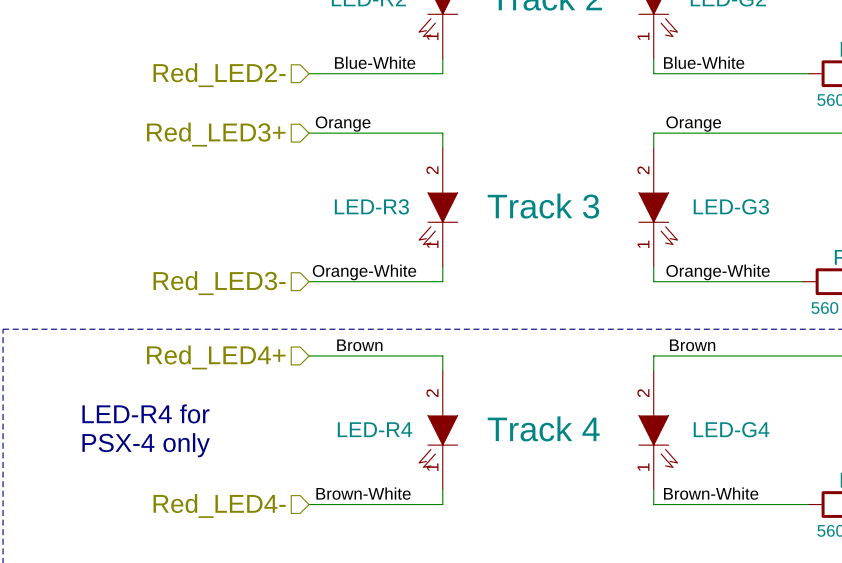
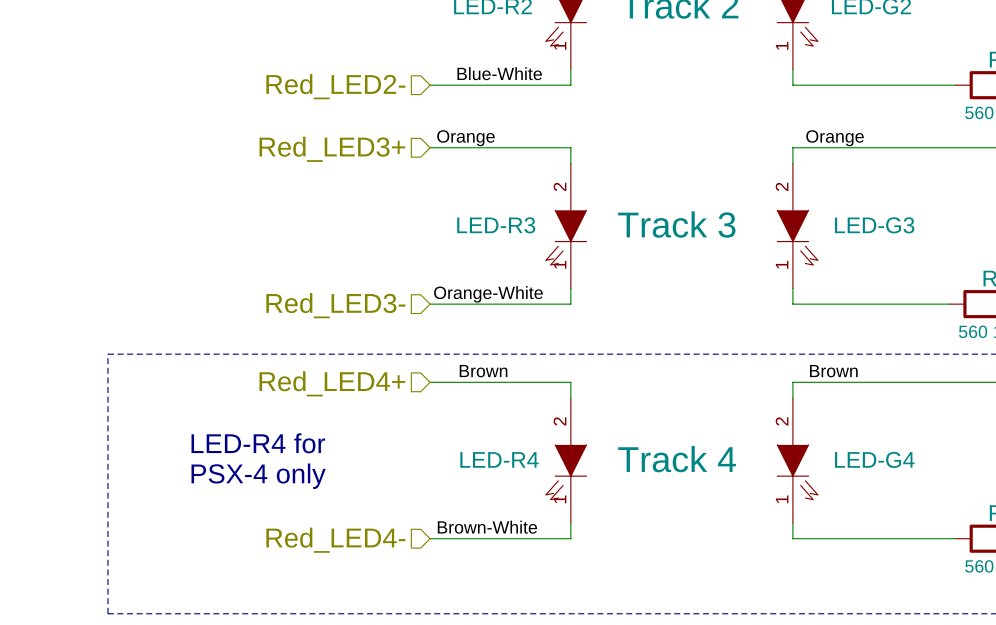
label: Blue-White (704, 62) -> none
label: Orange-White (718, 272) -> none
label: Brown-White (711, 493) -> none

